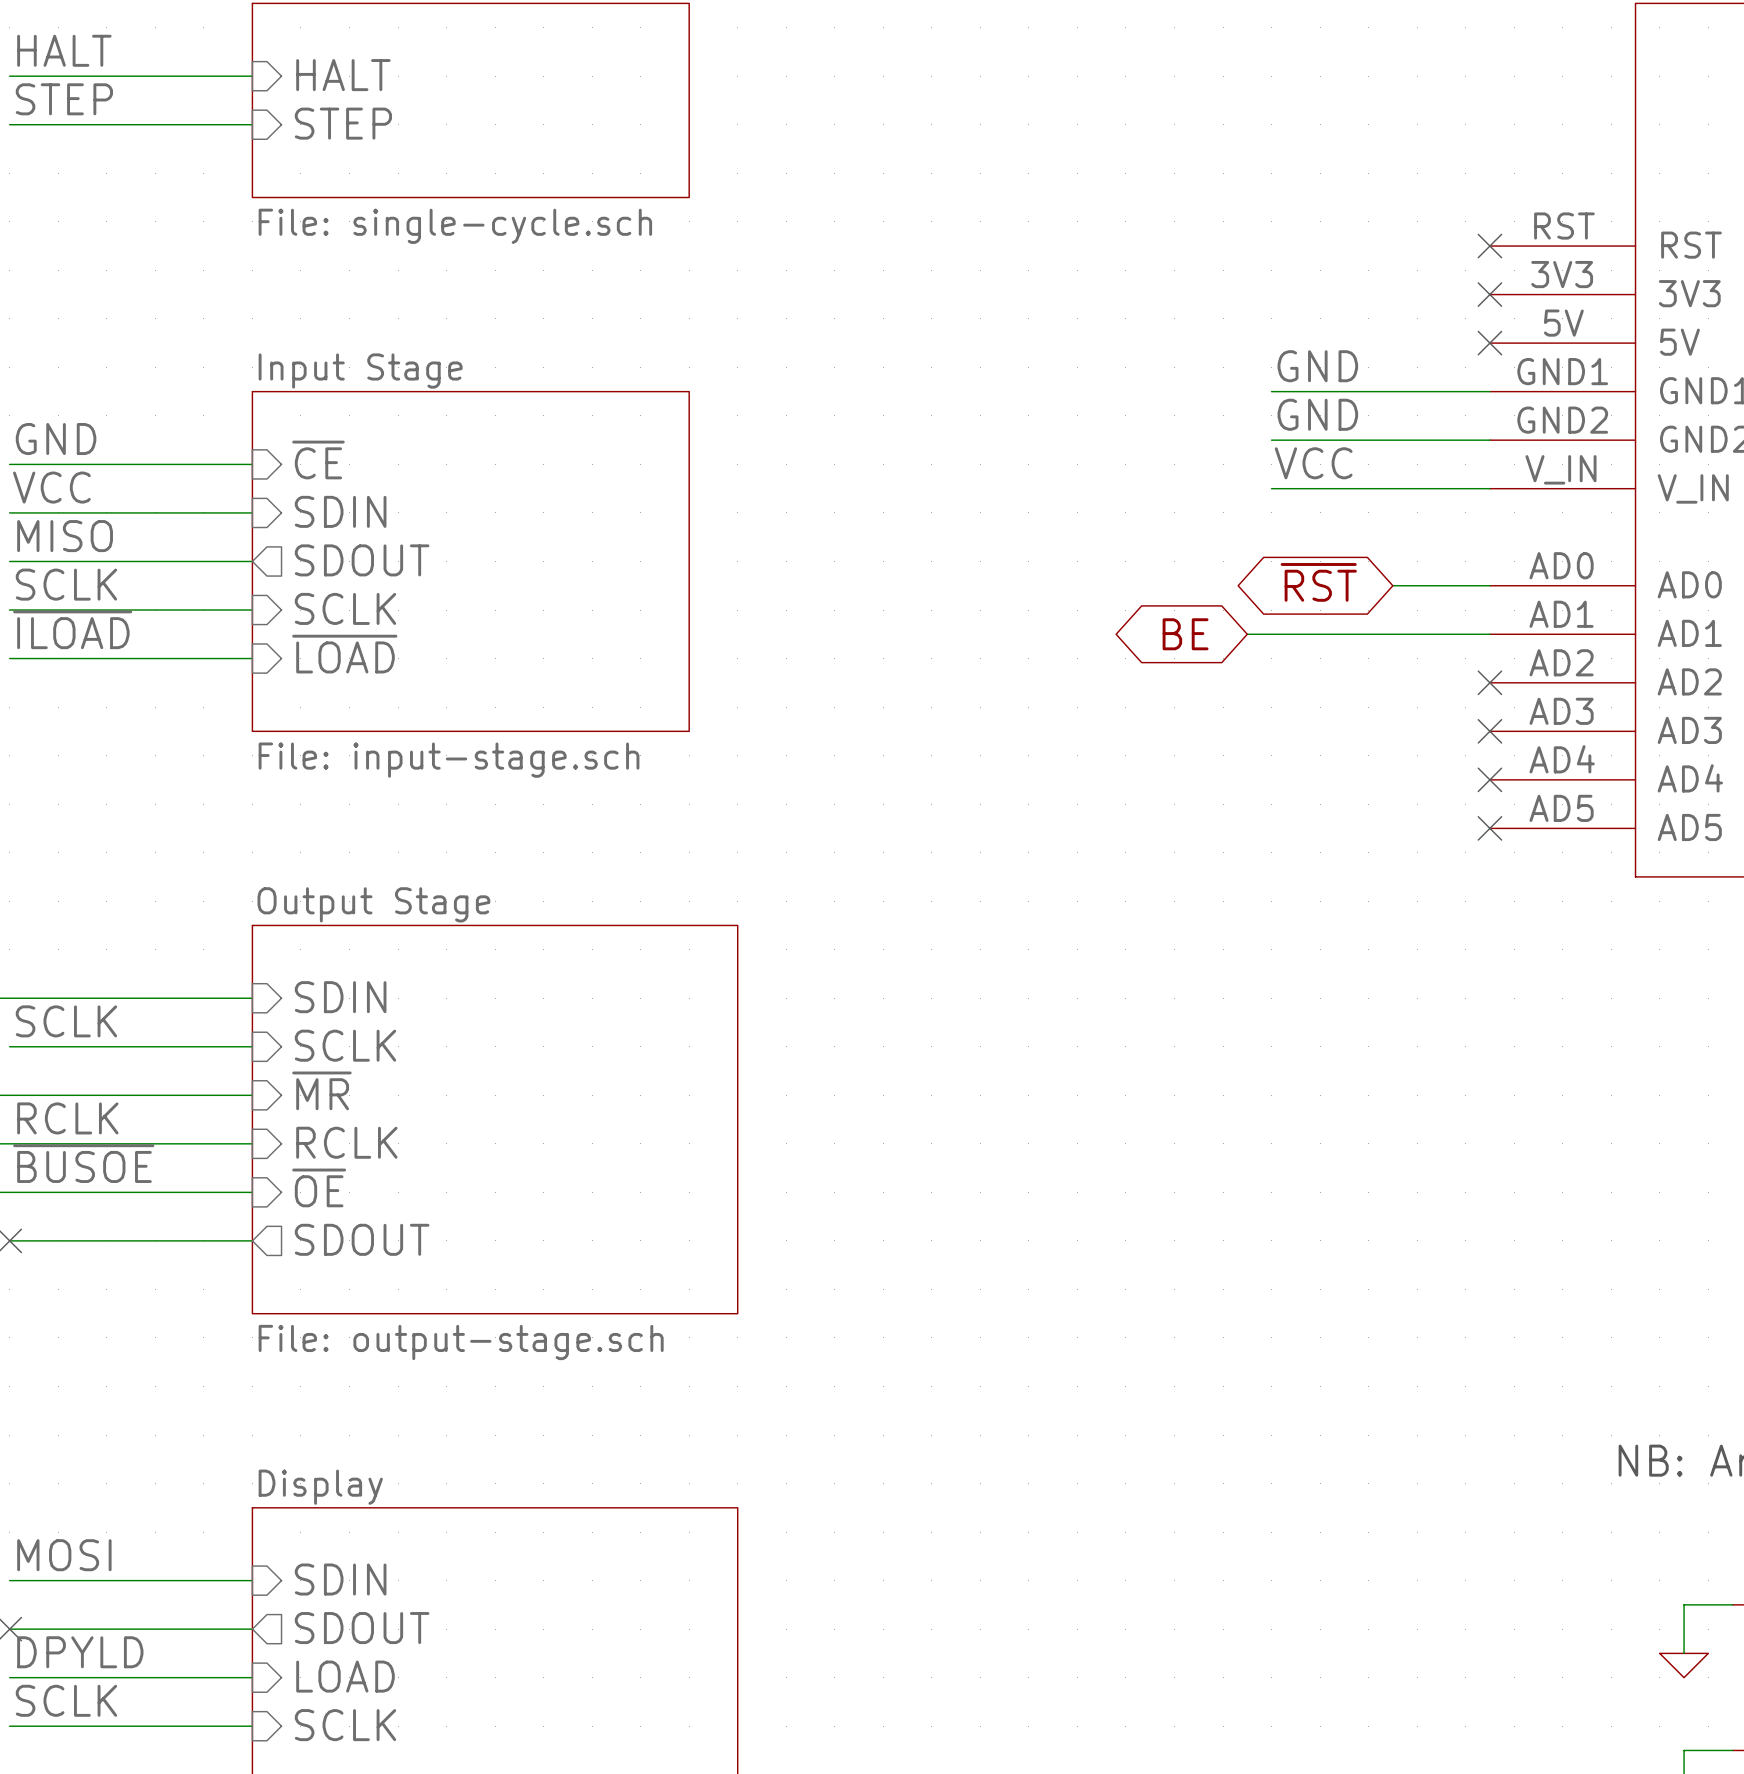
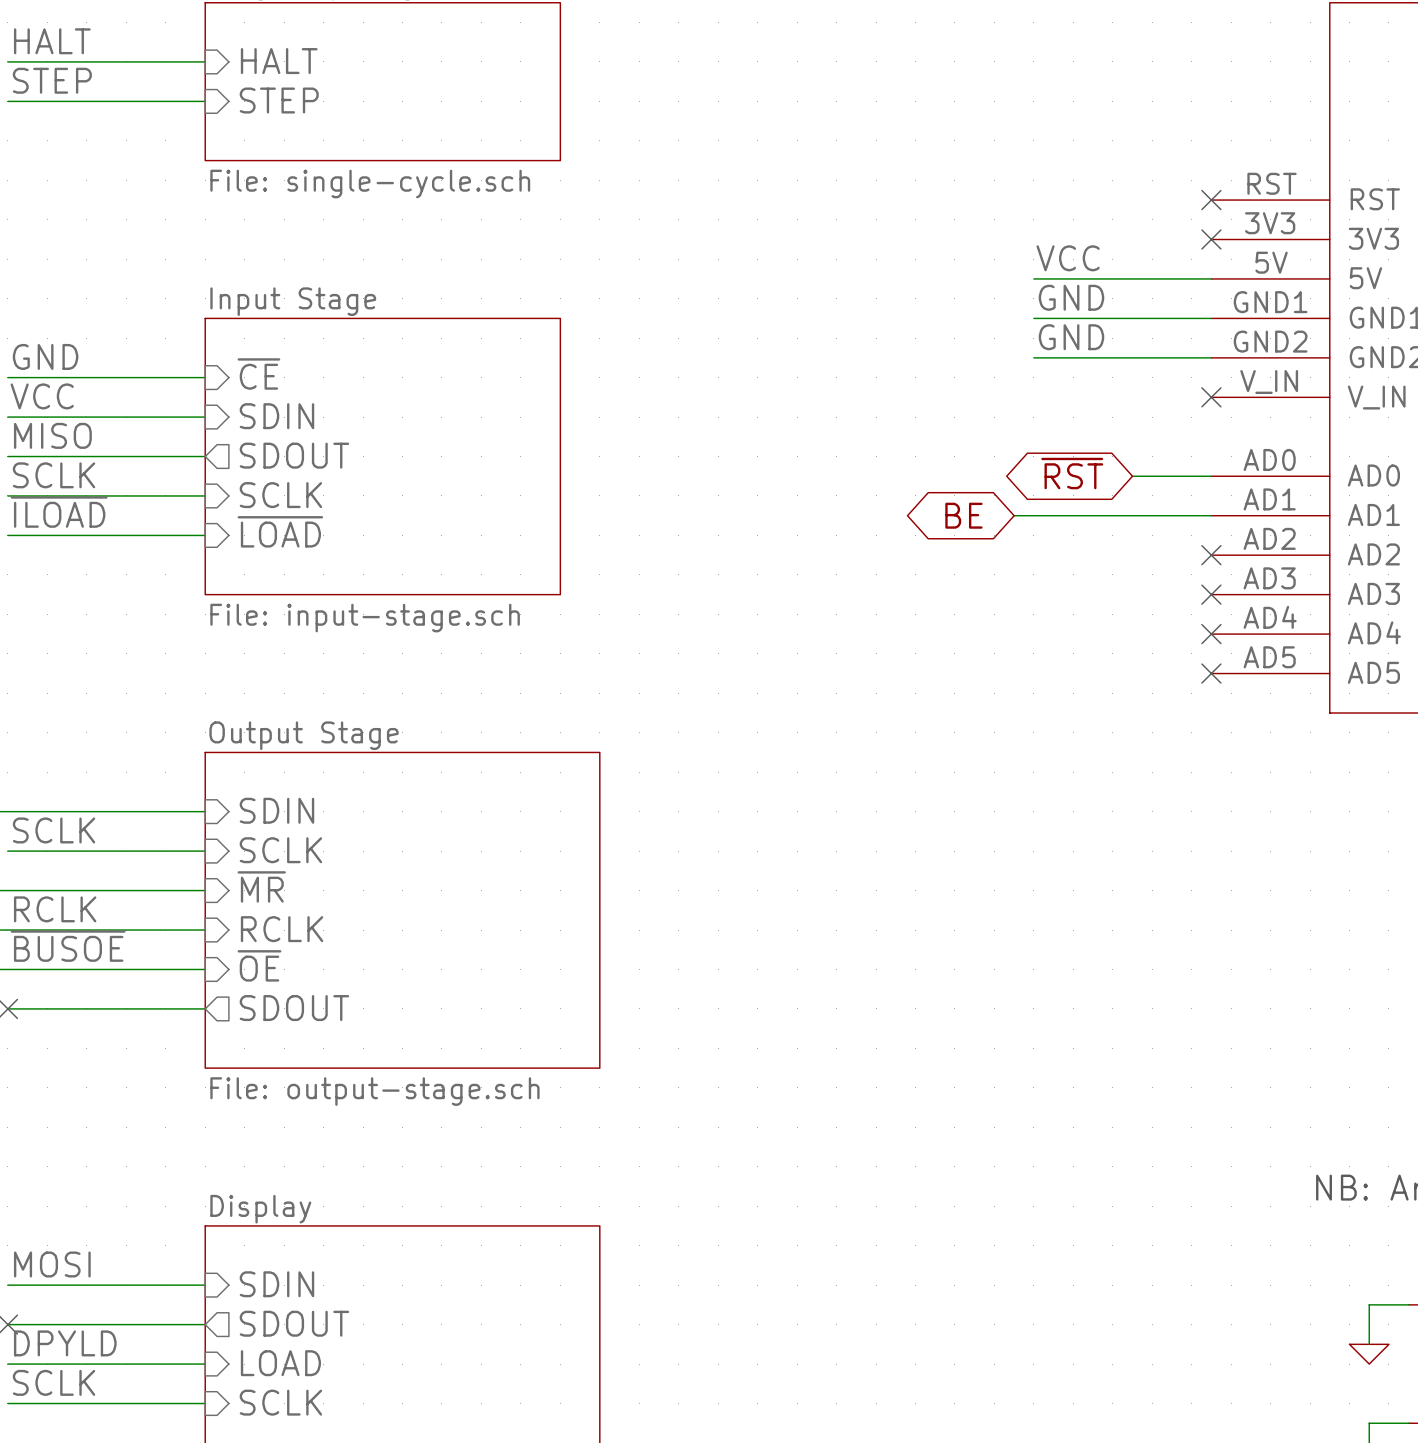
no-connect mark: (1489, 343) -> none
label position: VCC (1313, 463) -> VCC (1068, 258)
wire: (1271, 488) (1489, 488) -> (1033, 278) (1211, 278)
no-connect mark: none -> (1211, 397)

